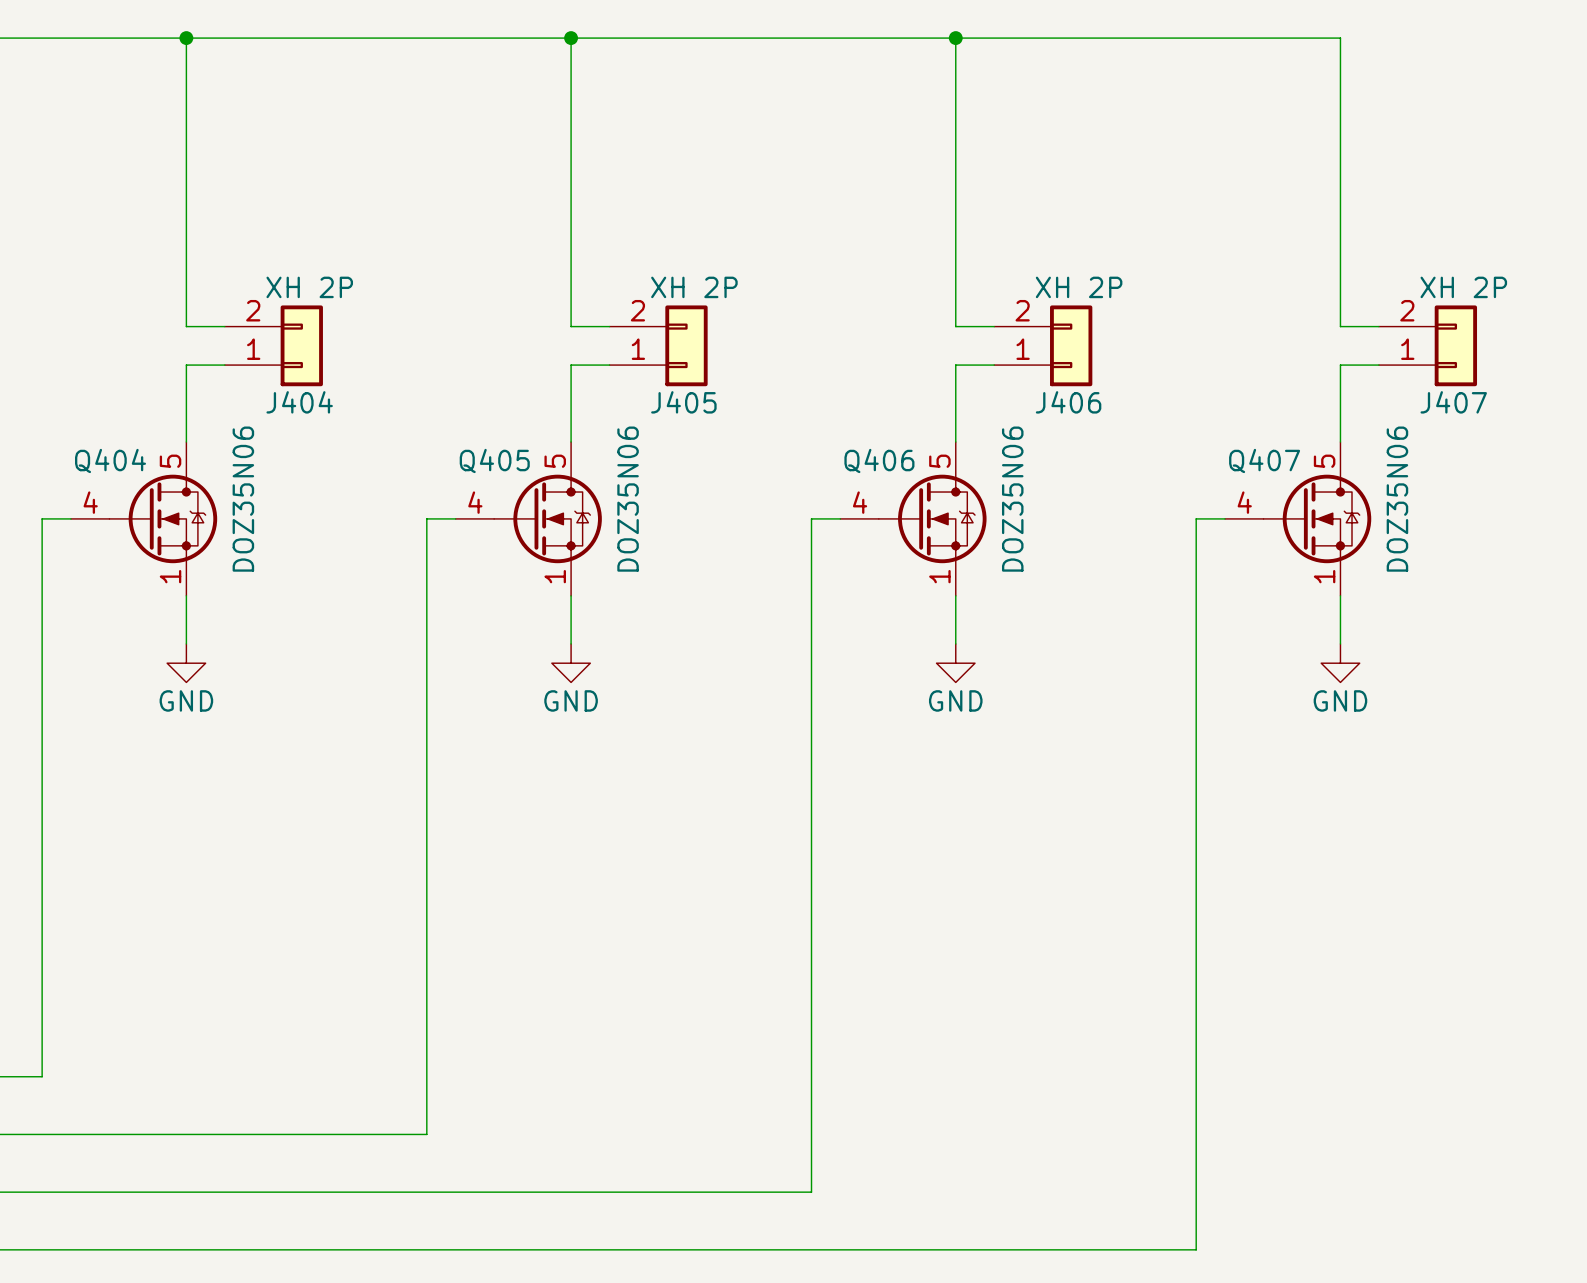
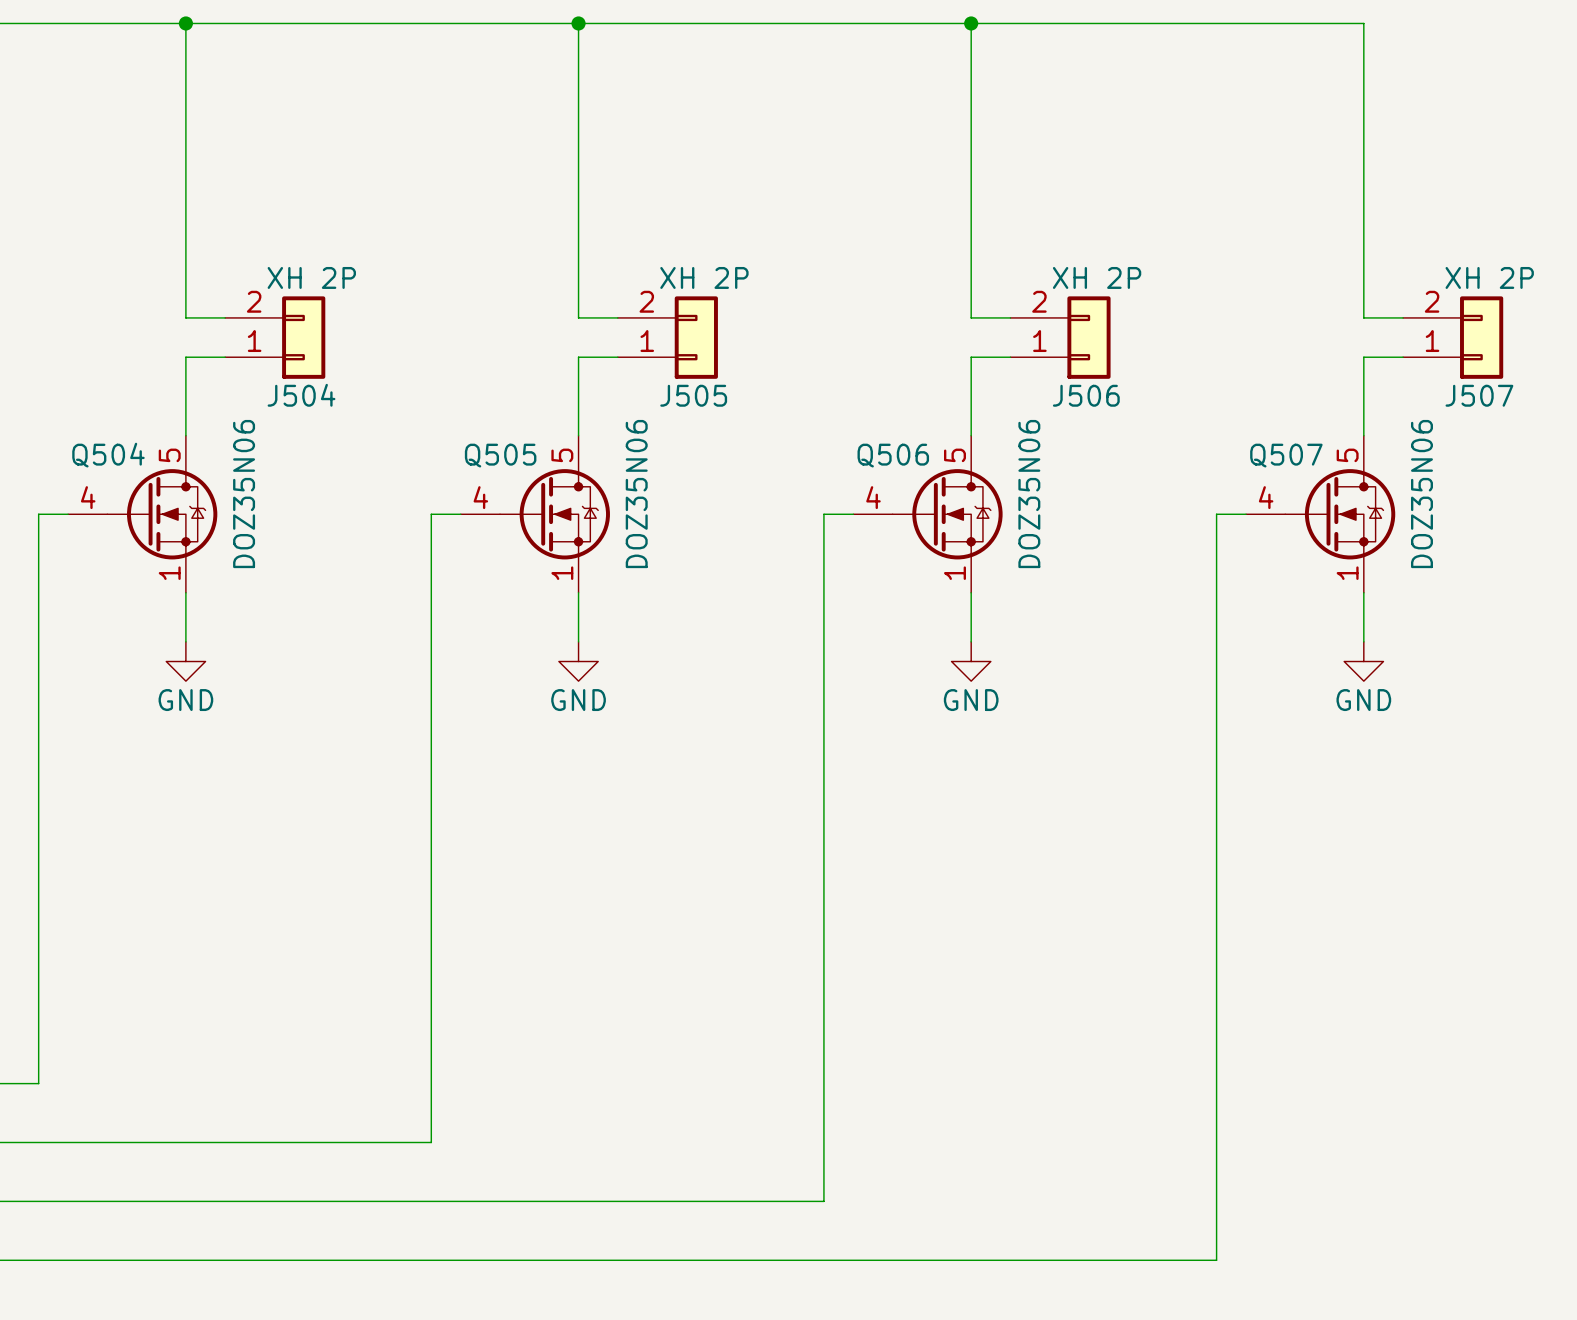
J404 name: J404 (299, 402) -> J504 (301, 395)
J405 name: J405 (683, 402) -> J505 (693, 395)
J406 name: J406 (1068, 402) -> J506 (1086, 395)
J407 name: J407 (1453, 402) -> J507 (1479, 395)
Q404 name: Q404 (110, 460) -> Q504 (108, 455)
Q405 name: Q405 (494, 460) -> Q505 (500, 455)
Q406 name: Q406 (879, 460) -> Q506 (893, 455)
Q407 name: Q407 (1264, 460) -> Q507 (1286, 455)

